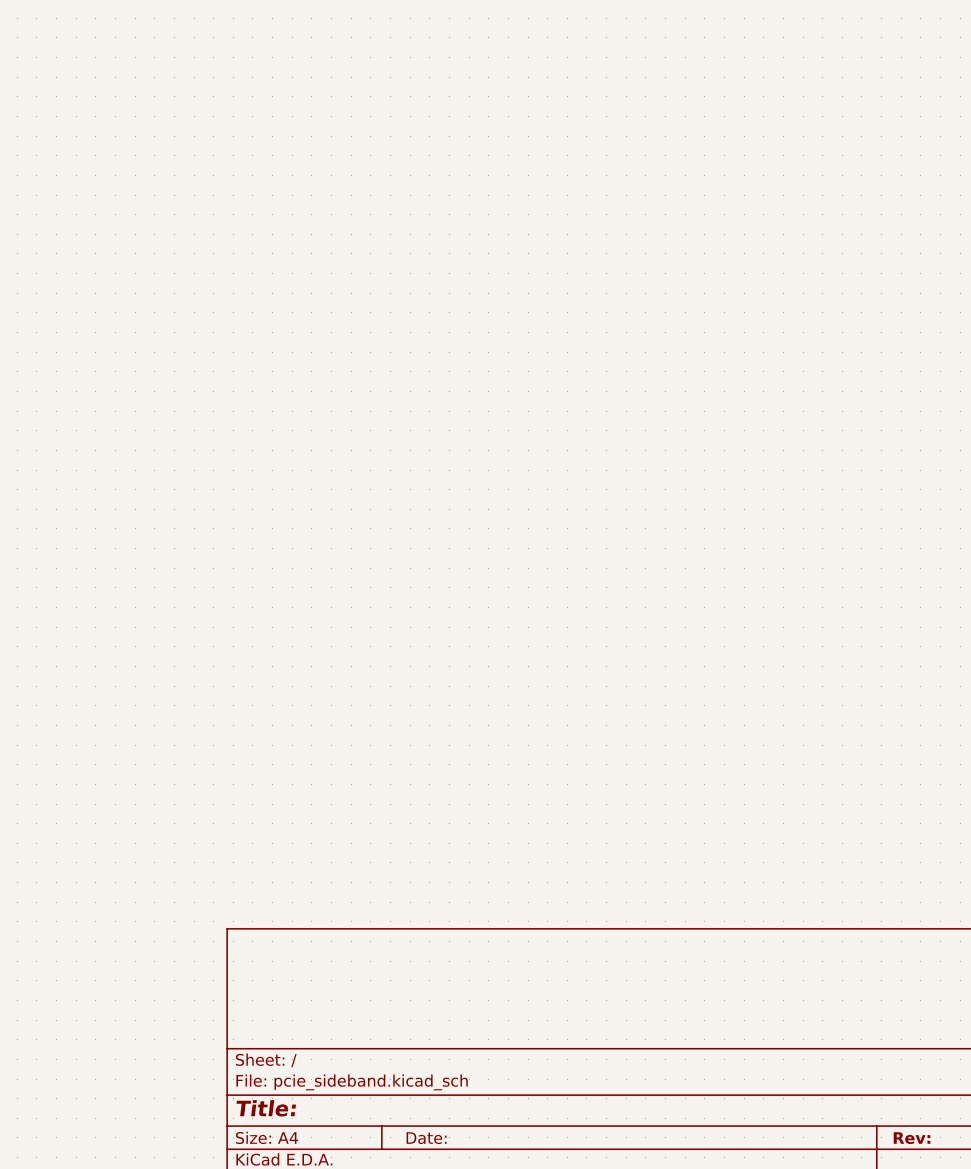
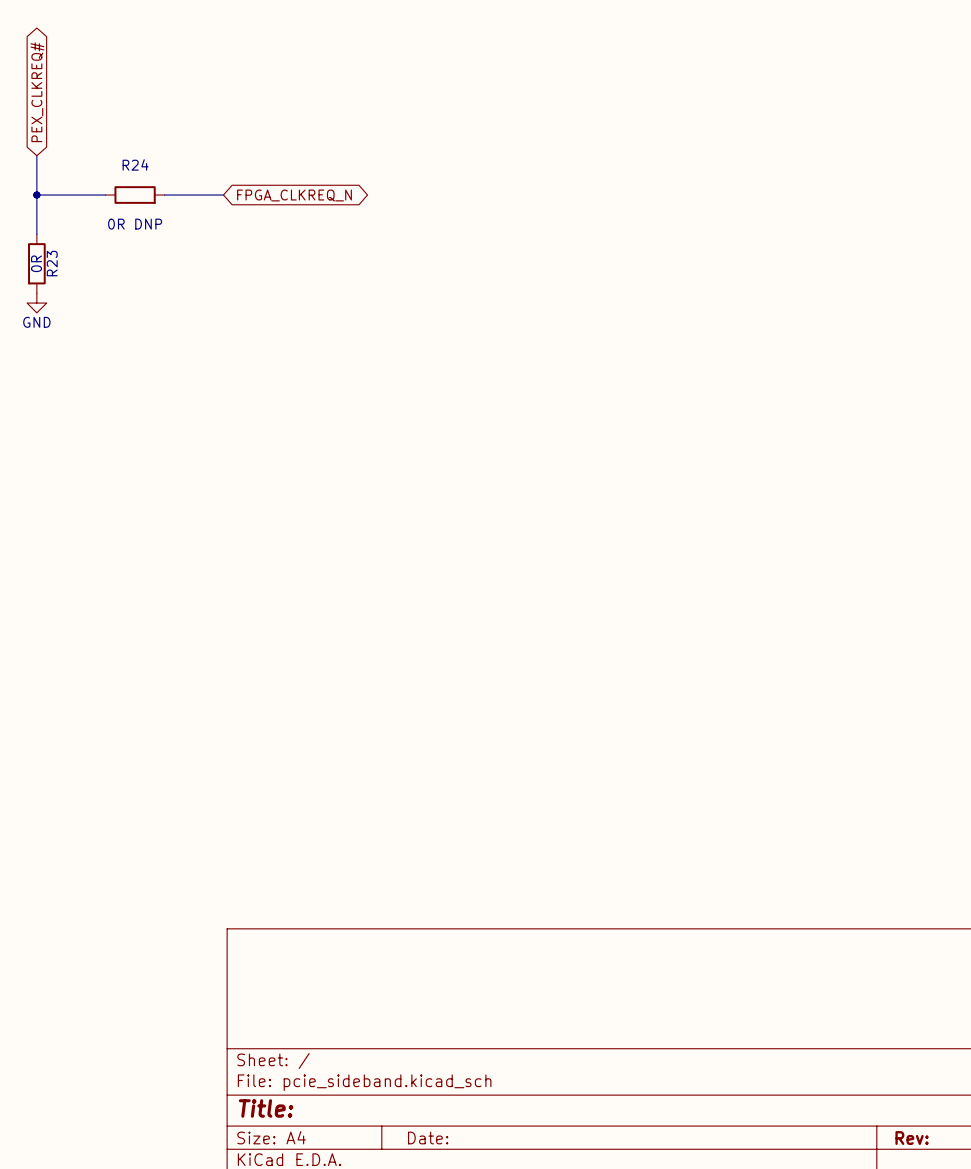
global label: none -> PEX_CLKREQ# (37, 92)
wire: none -> (36, 155) (36, 234)
wire: none -> (36, 195) (105, 195)
junction: none -> (36, 195)
R24: none -> 0R DNP (135, 195)
wire: none -> (164, 195) (223, 195)
global label: none -> FPGA_CLKREQ_N (294, 195)
R23: none -> 0R (36, 263)
power symbol: none -> GND (36, 303)

